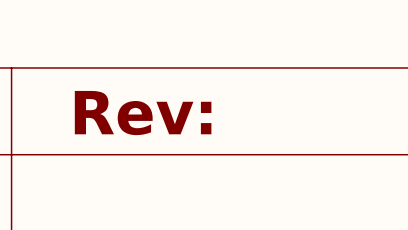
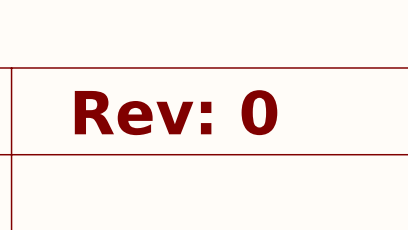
title block: Rev: (143, 113) -> Rev: 0 (176, 112)

